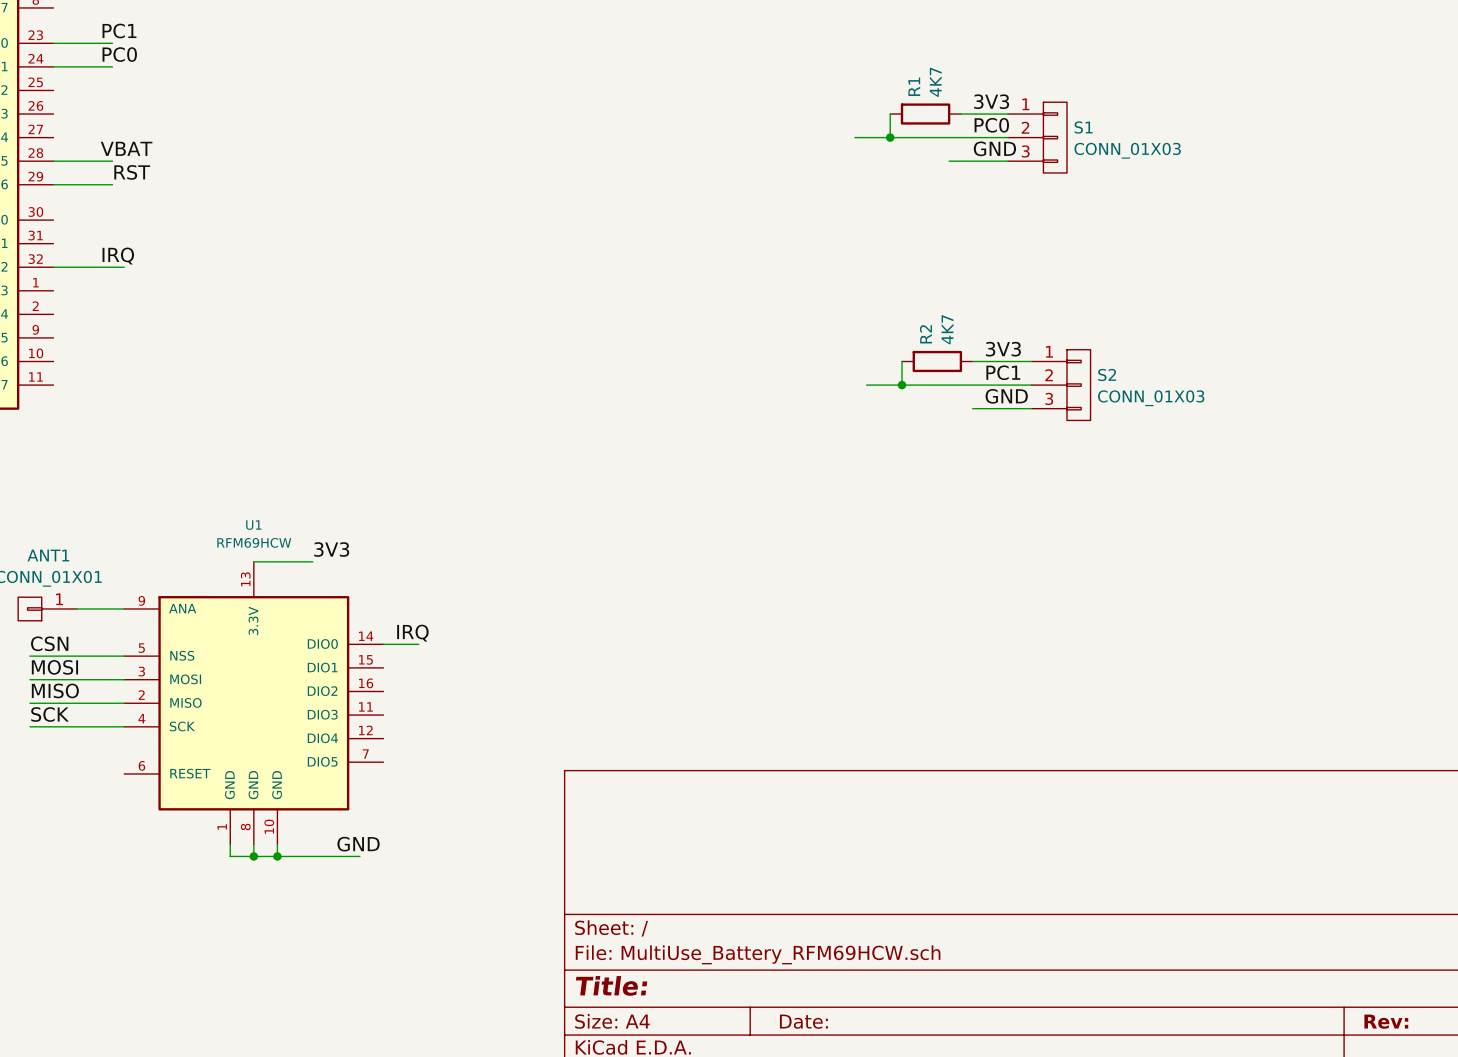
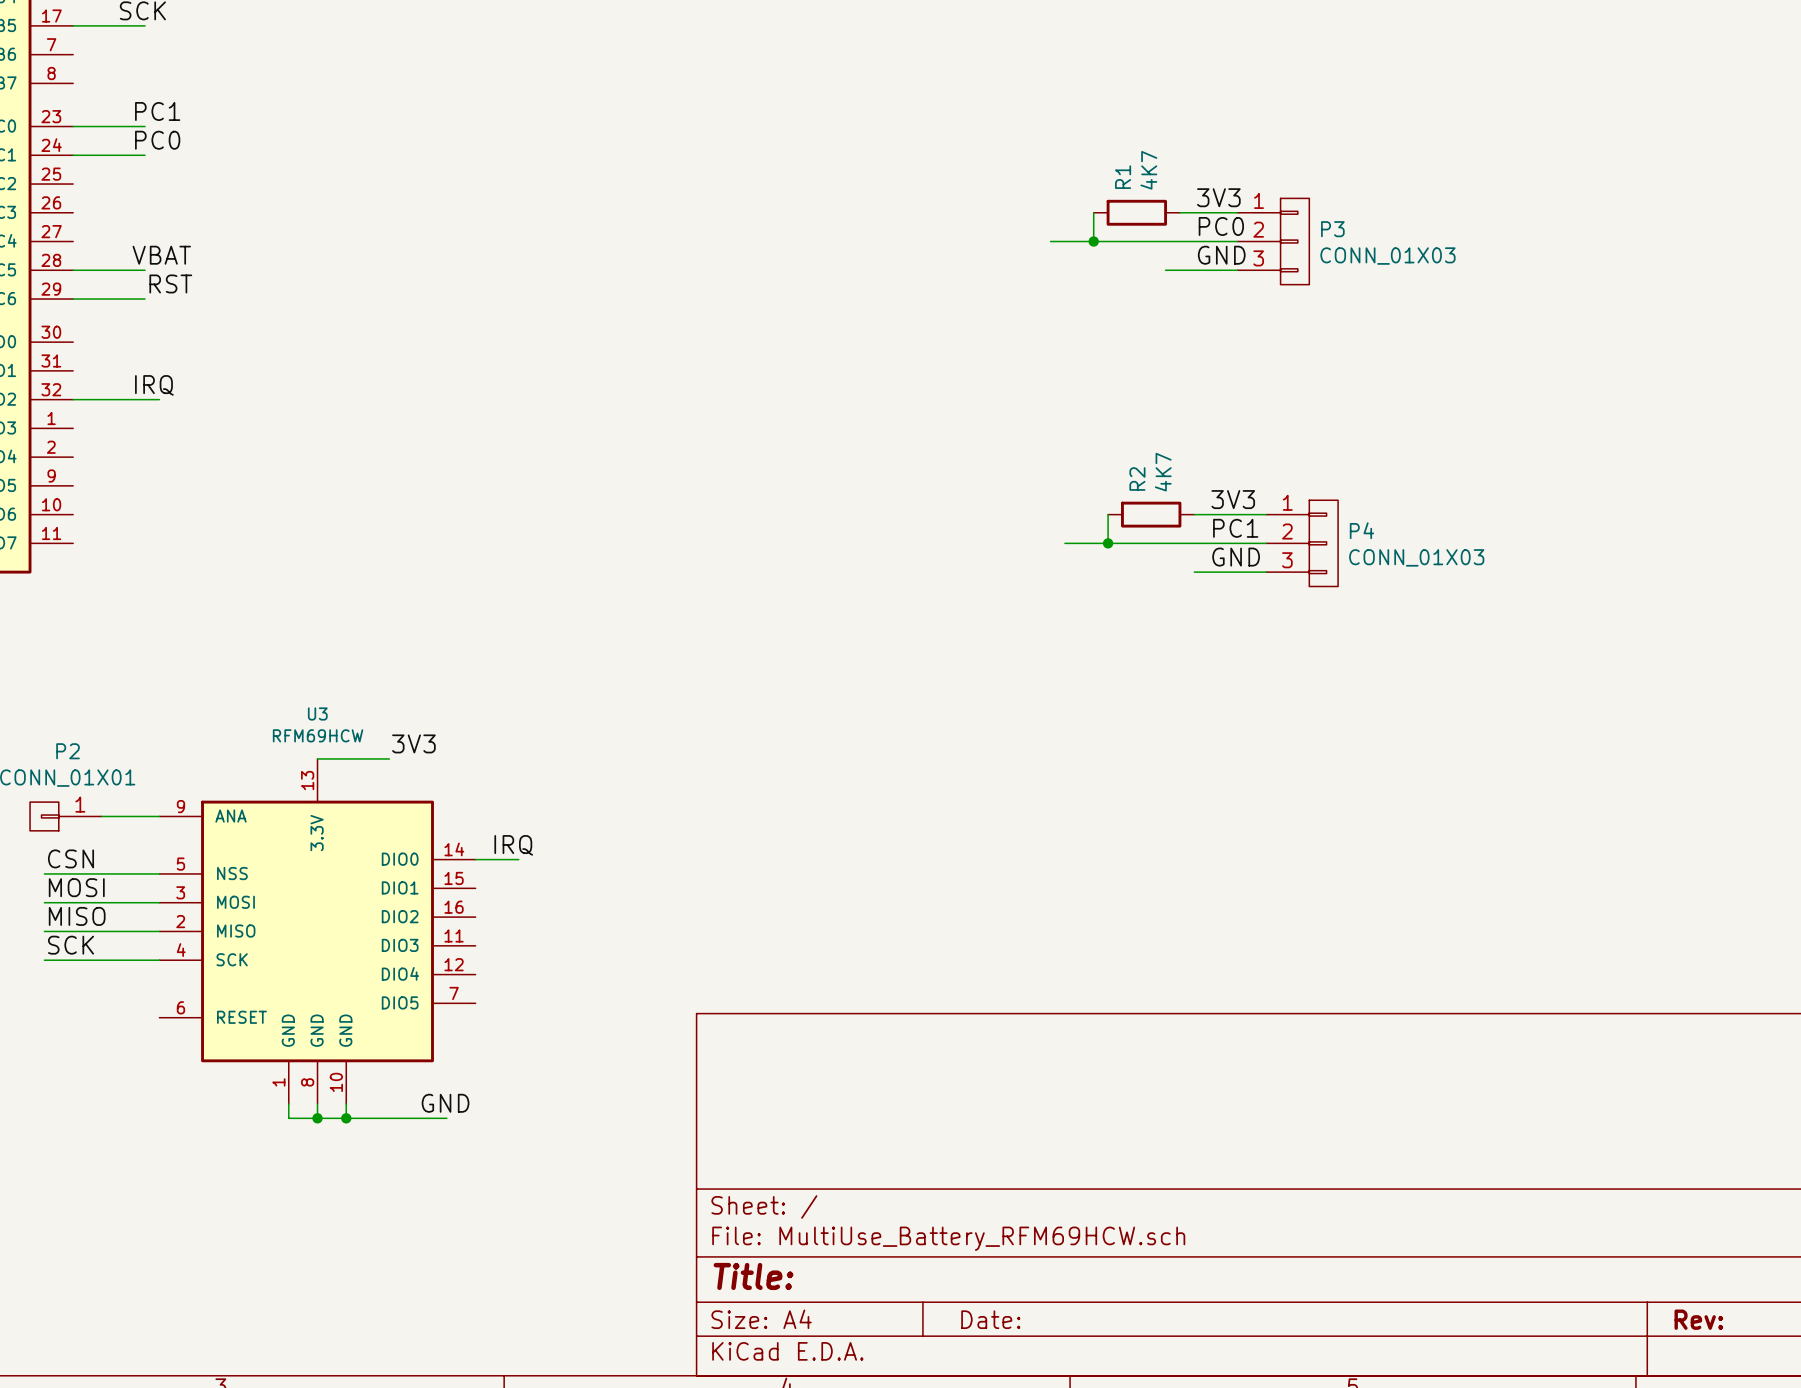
S1 name: S1 (1083, 127) -> P3 (1332, 229)
S2 name: S2 (1107, 374) -> P4 (1361, 530)
U1 name: U1 (253, 525) -> U3 (317, 713)
ANT1 name: ANT1 (48, 555) -> P2 (68, 751)

